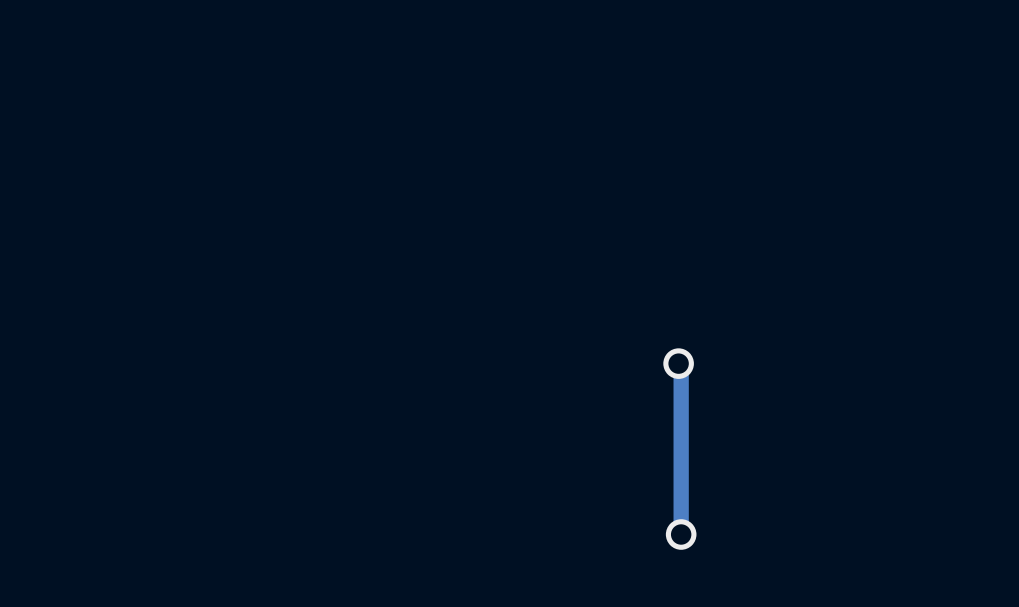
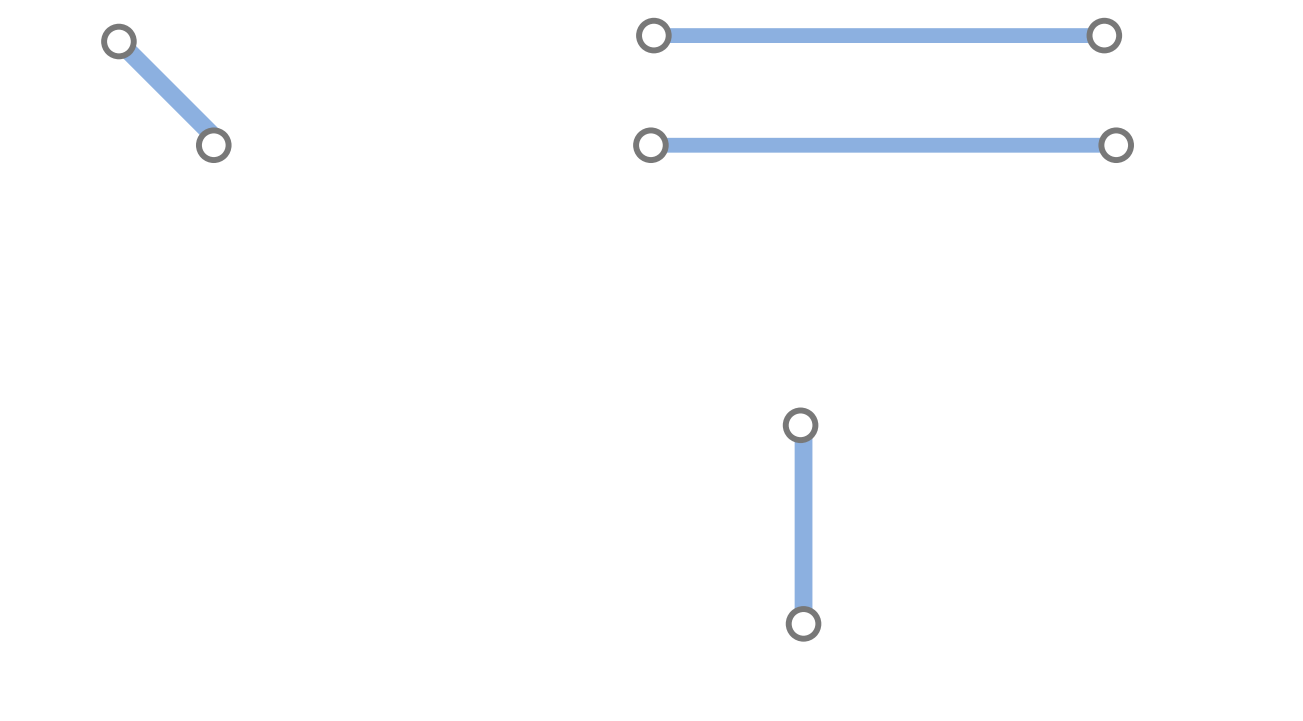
via: none -> (653, 35)
track: none -> (1104, 35) (653, 35)
via: none -> (1104, 35)
track: none -> (118, 41) (213, 136) (213, 145)
via: none -> (118, 41)
via: none -> (213, 145)
via: none -> (650, 145)
track: none -> (1116, 145) (650, 145)
via: none -> (1116, 145)

